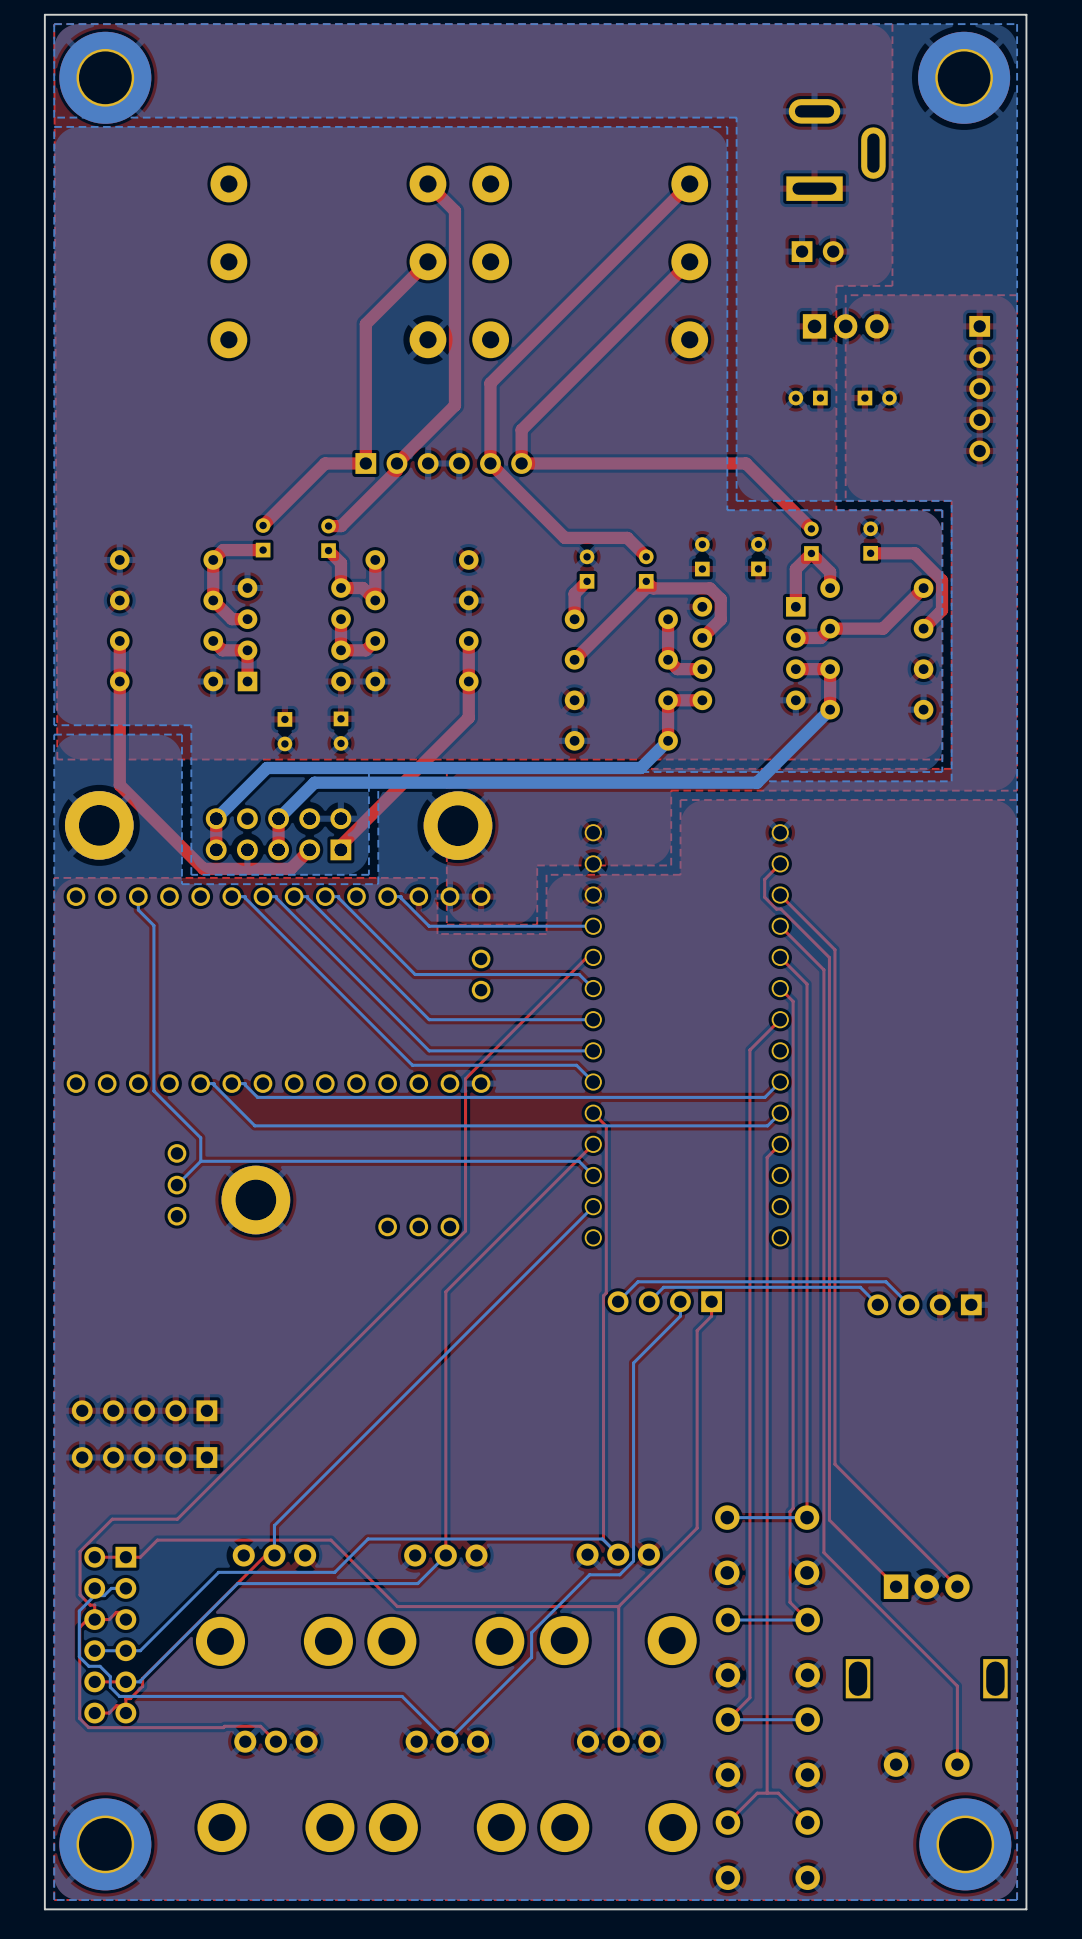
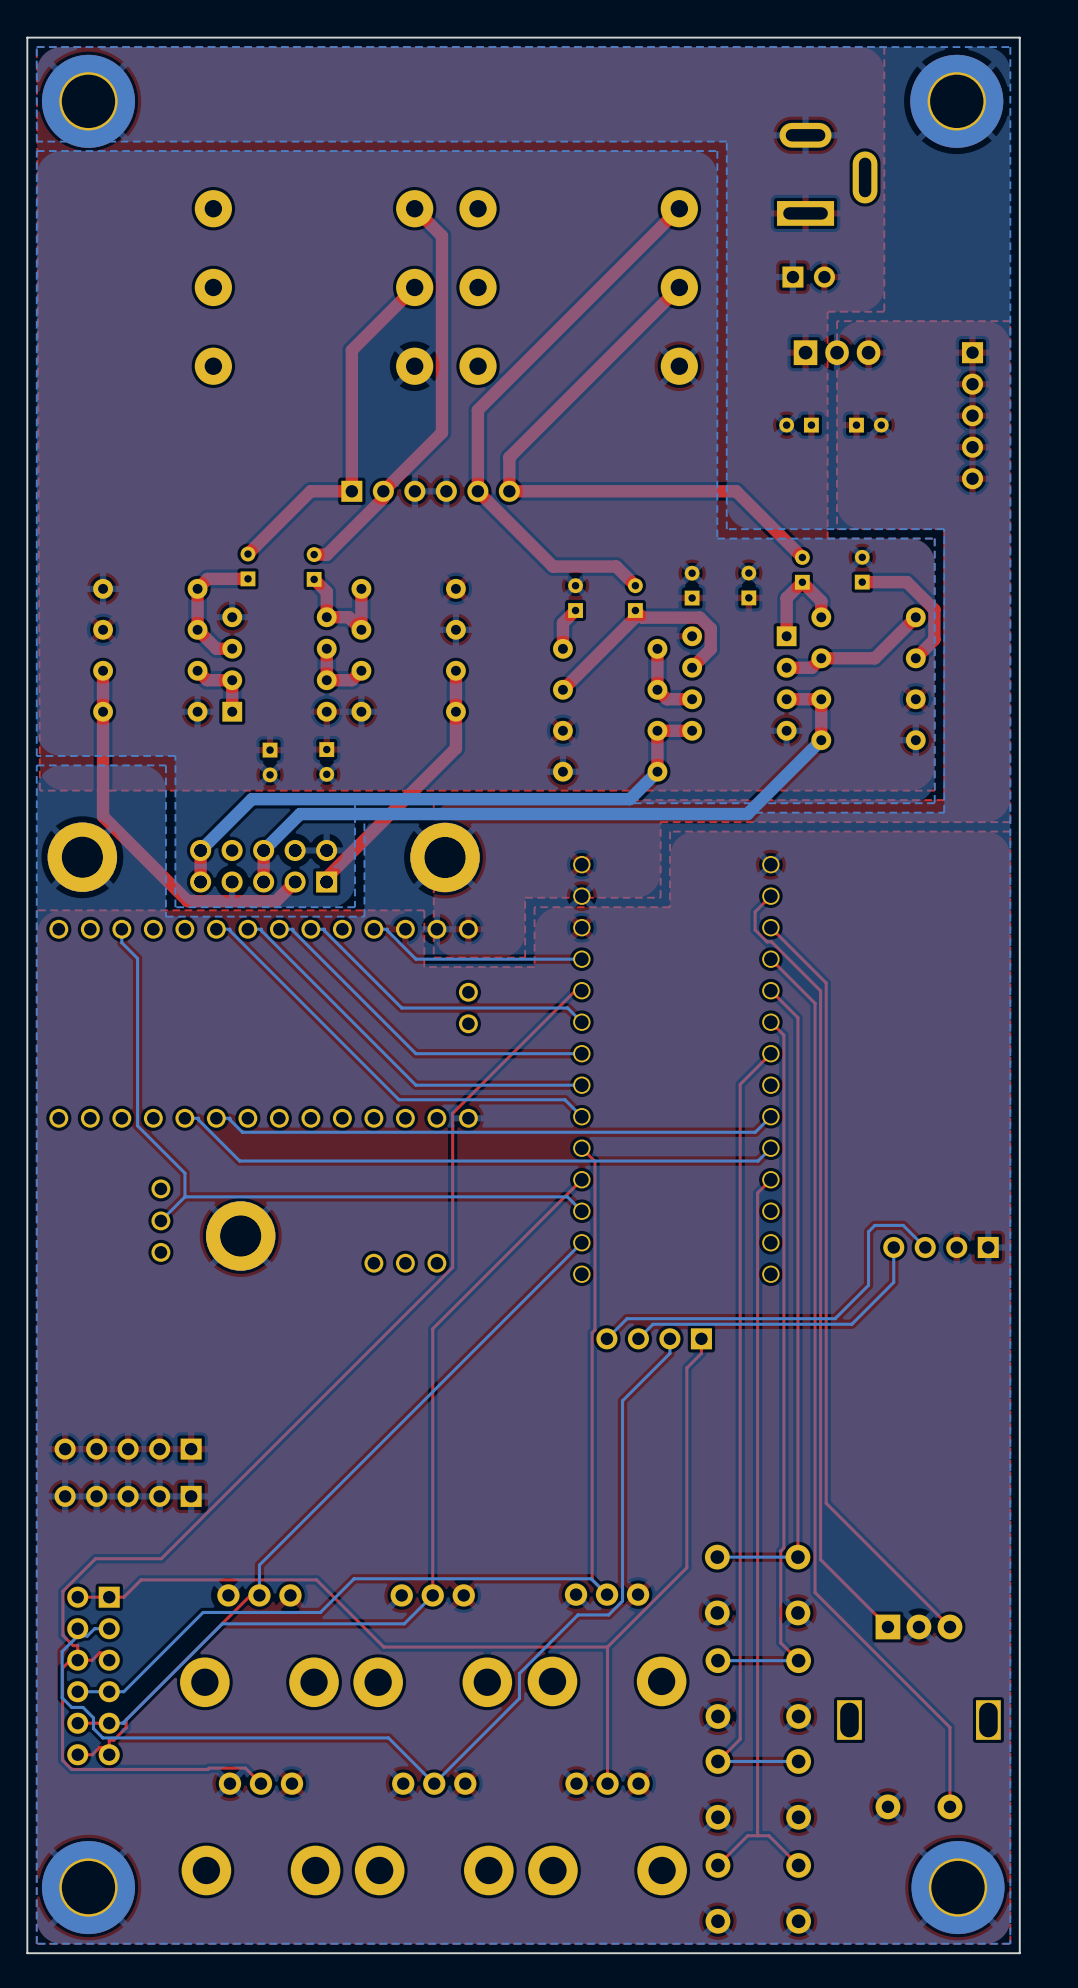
bottom track: (843, 1281) (885, 1281) (909, 1304) -> (835, 1318) (868, 1285) (868, 1231) (874, 1225) (903, 1225) (925, 1247)
bottom track: (860, 1287) (877, 1304) -> (851, 1324) (893, 1282) (893, 1247)
part position: (924, 1304) -> (941, 1247)

